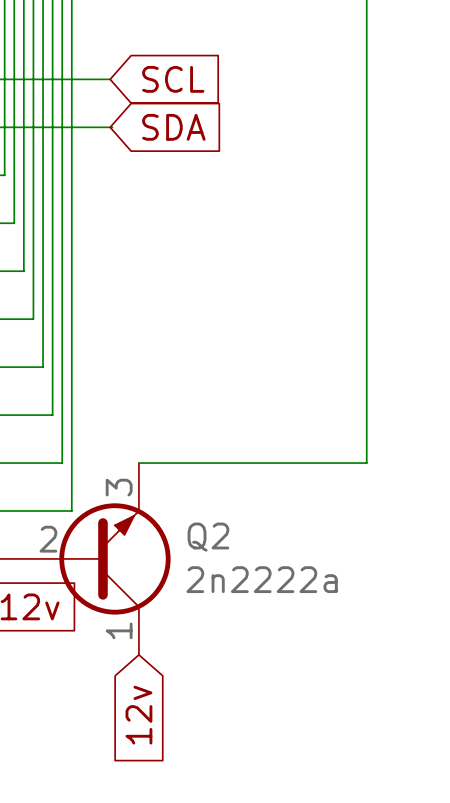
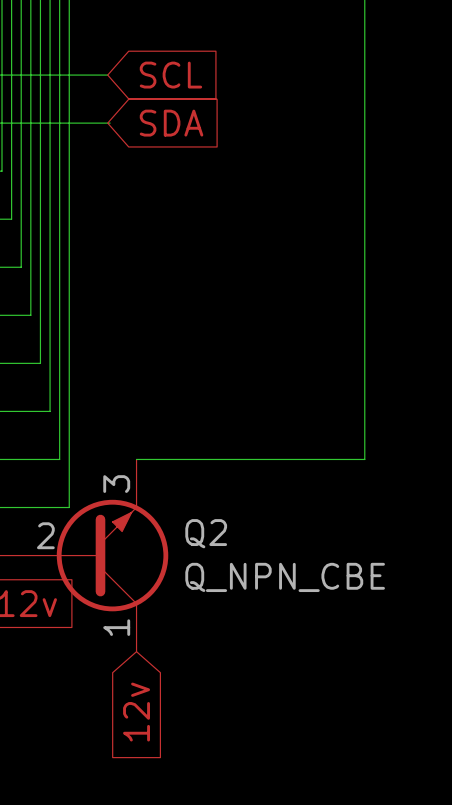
Q2 value: 2n2222a (262, 579) -> Q_NPN_CBE (285, 577)

